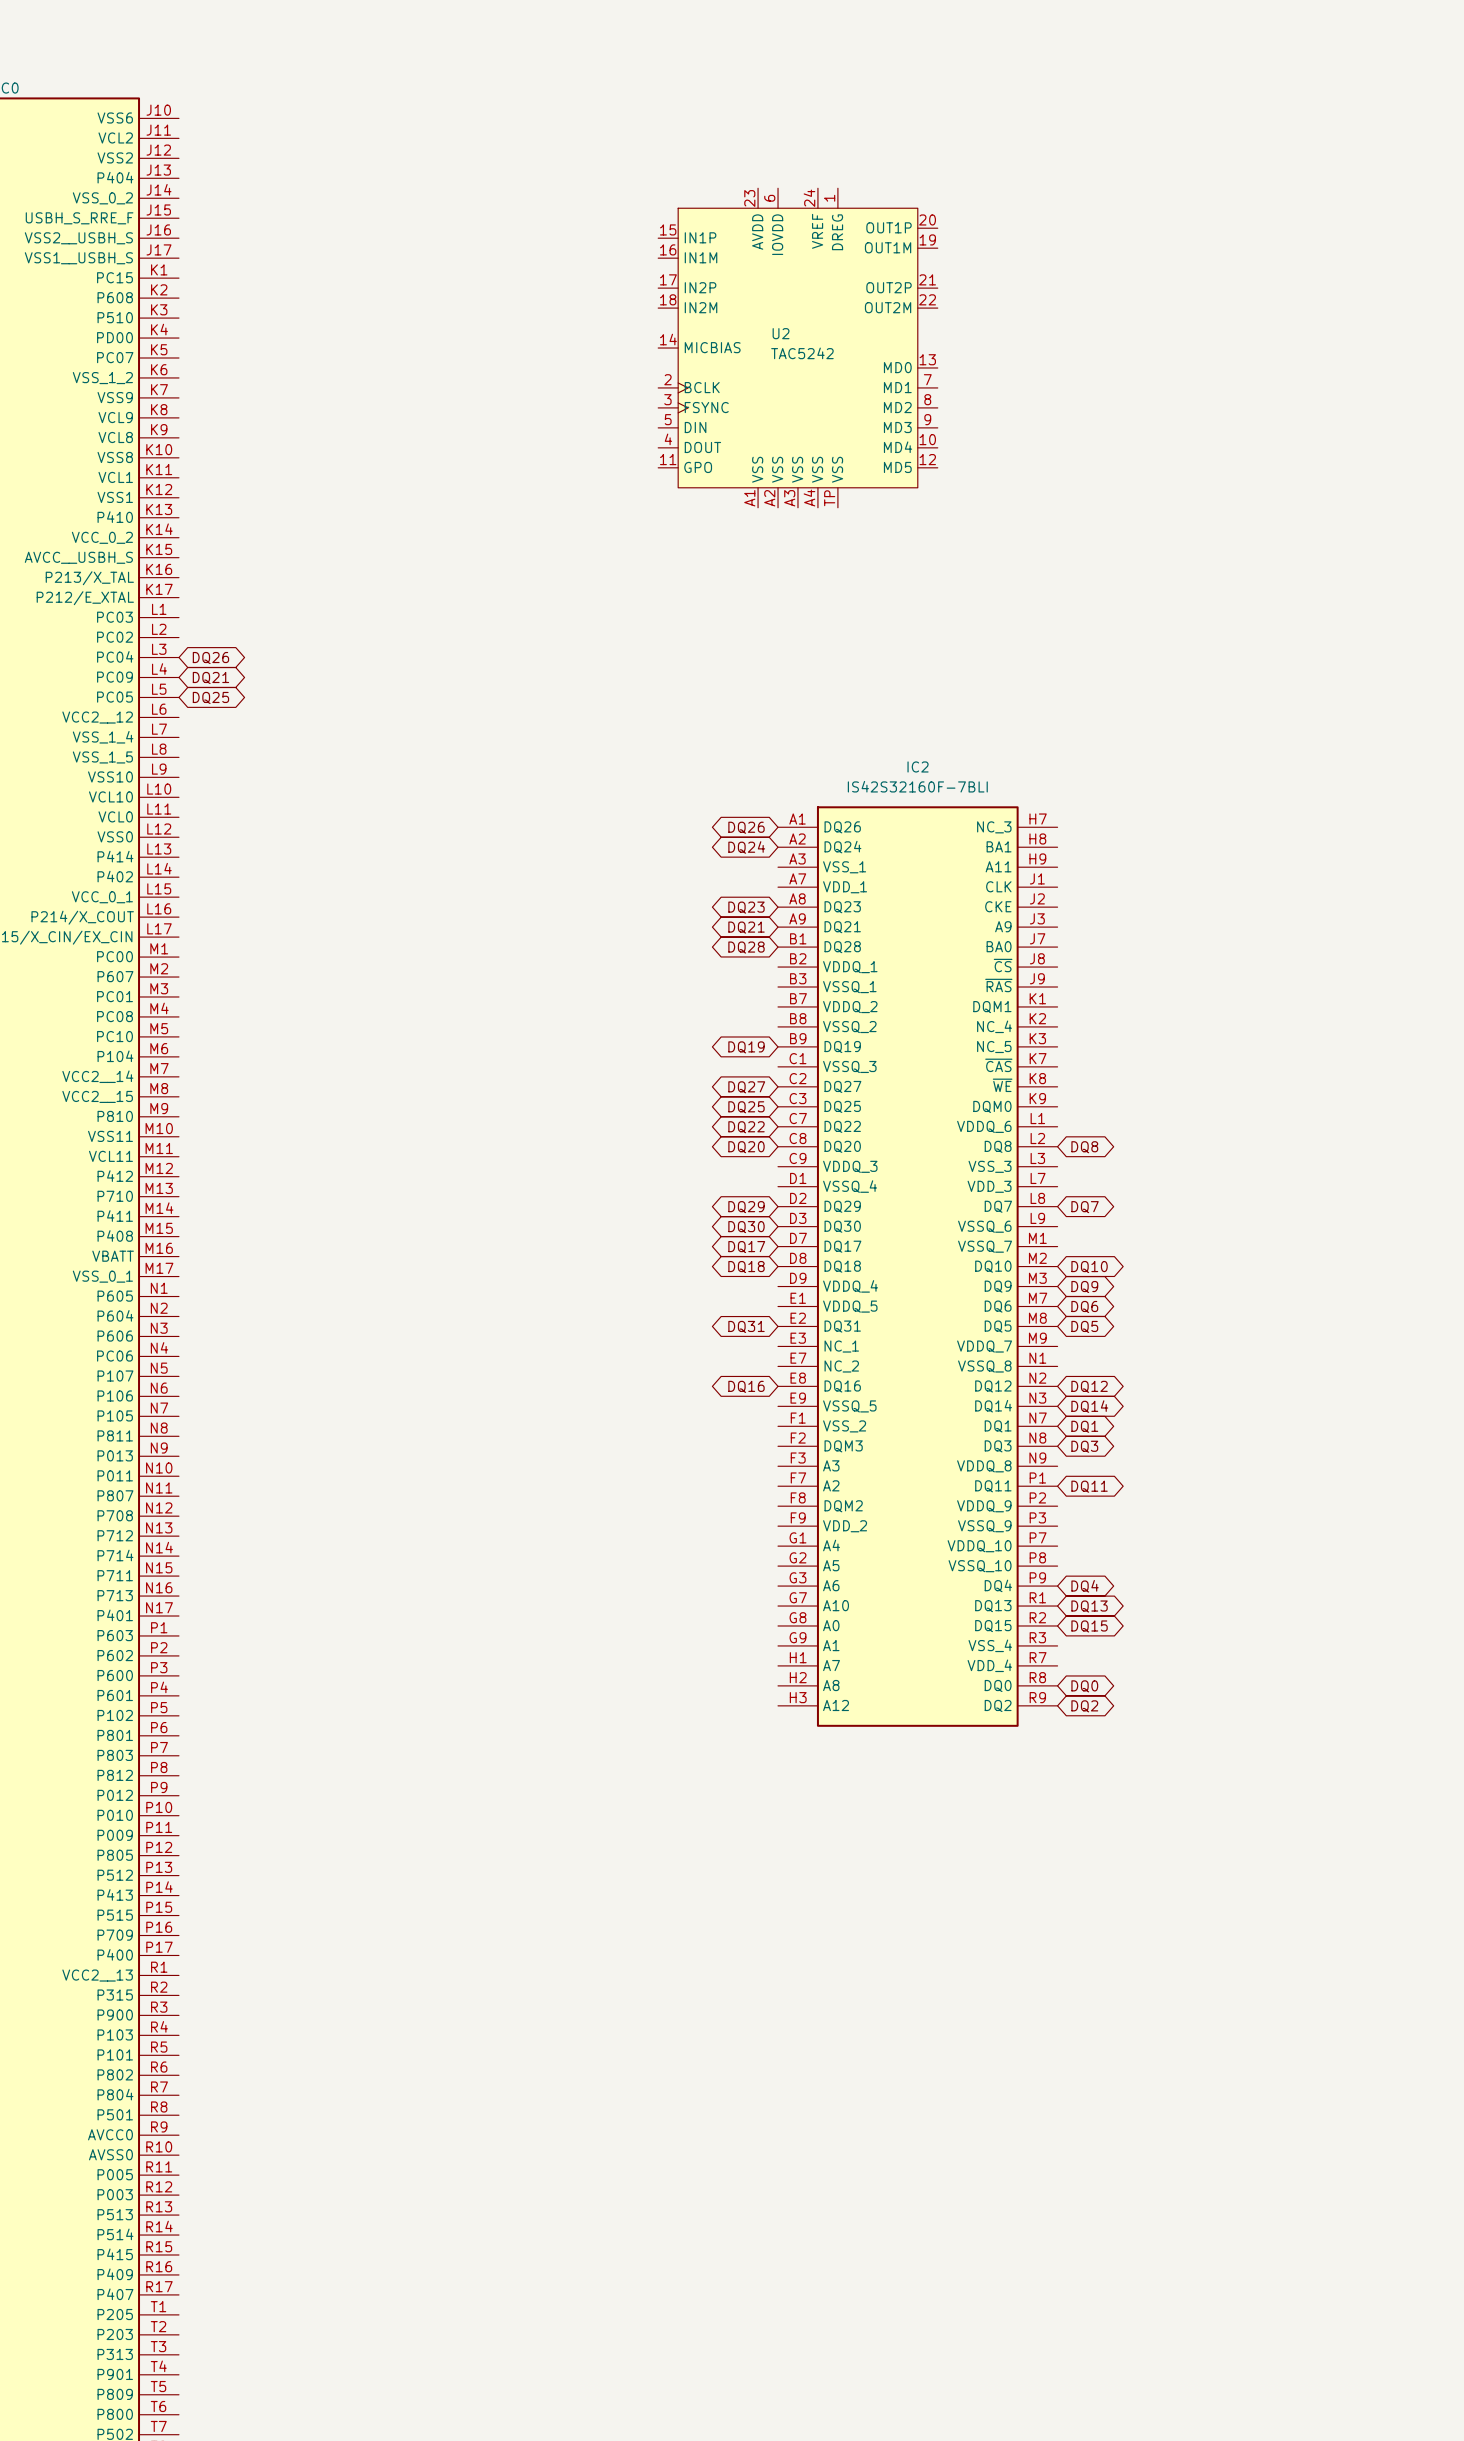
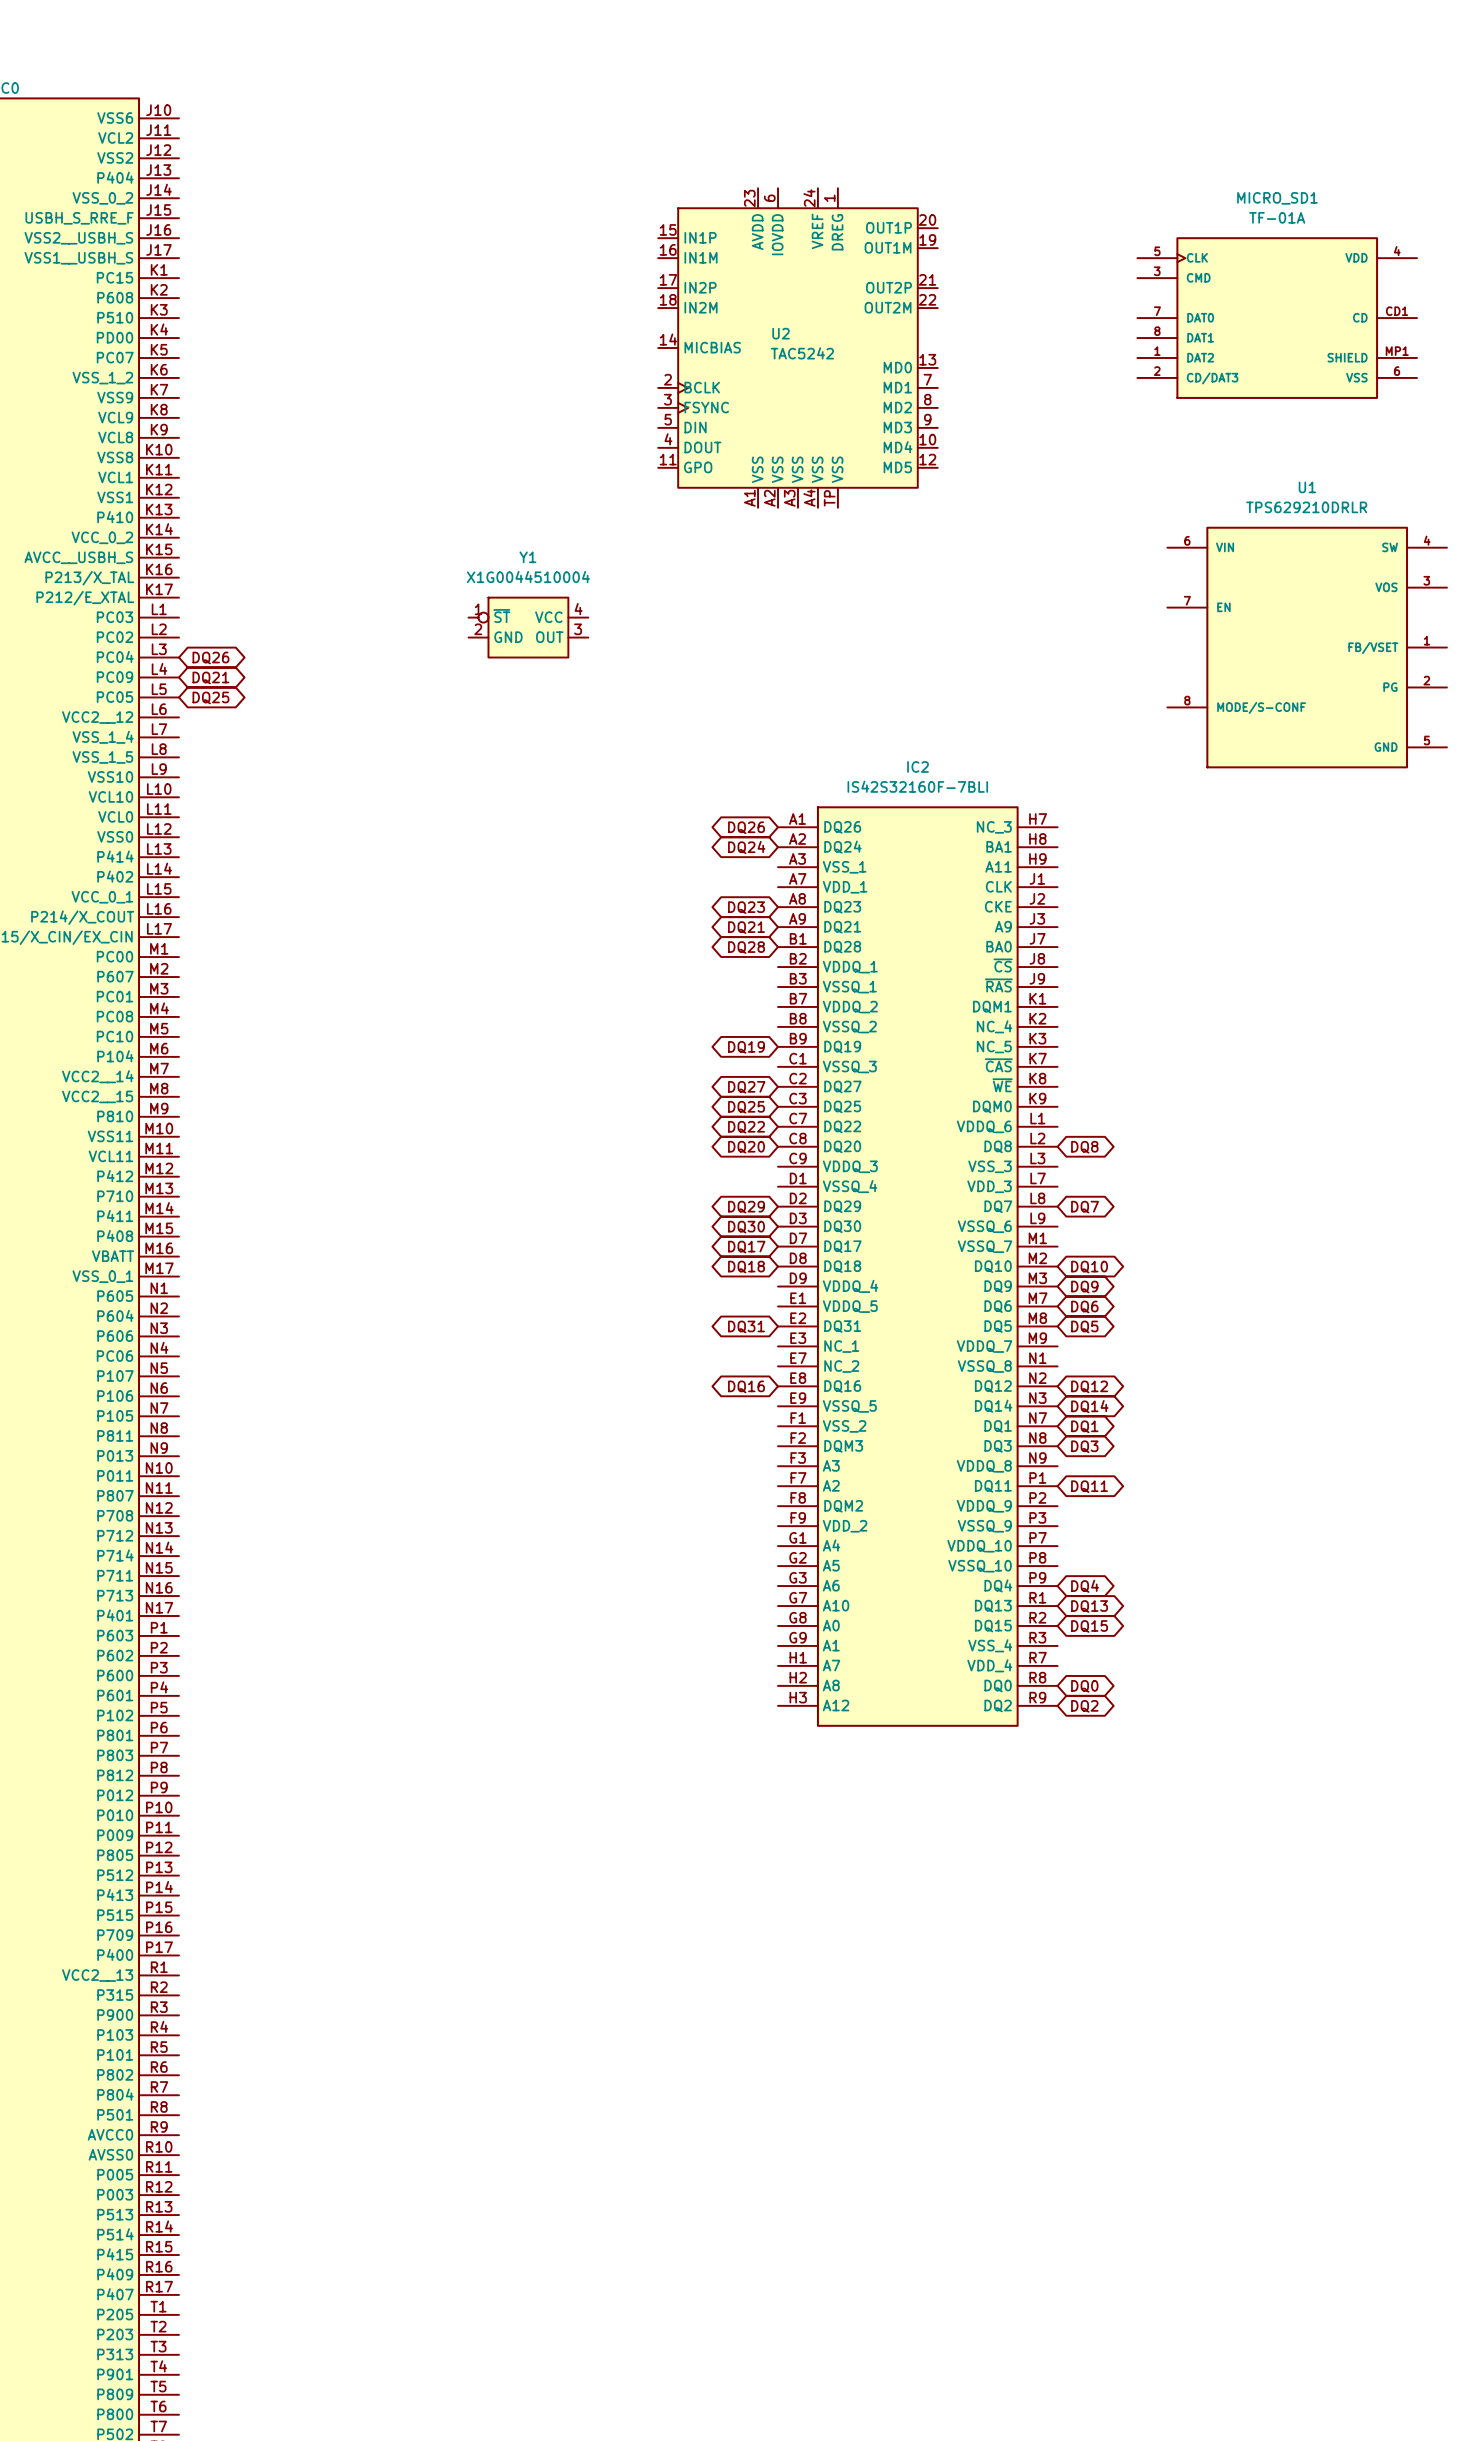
MICRO_SD1: none -> TF-01A (1277, 318)
Y1: none -> X1G0044510004 (528, 627)
U1: none -> TPS629210DRLR (1307, 647)

